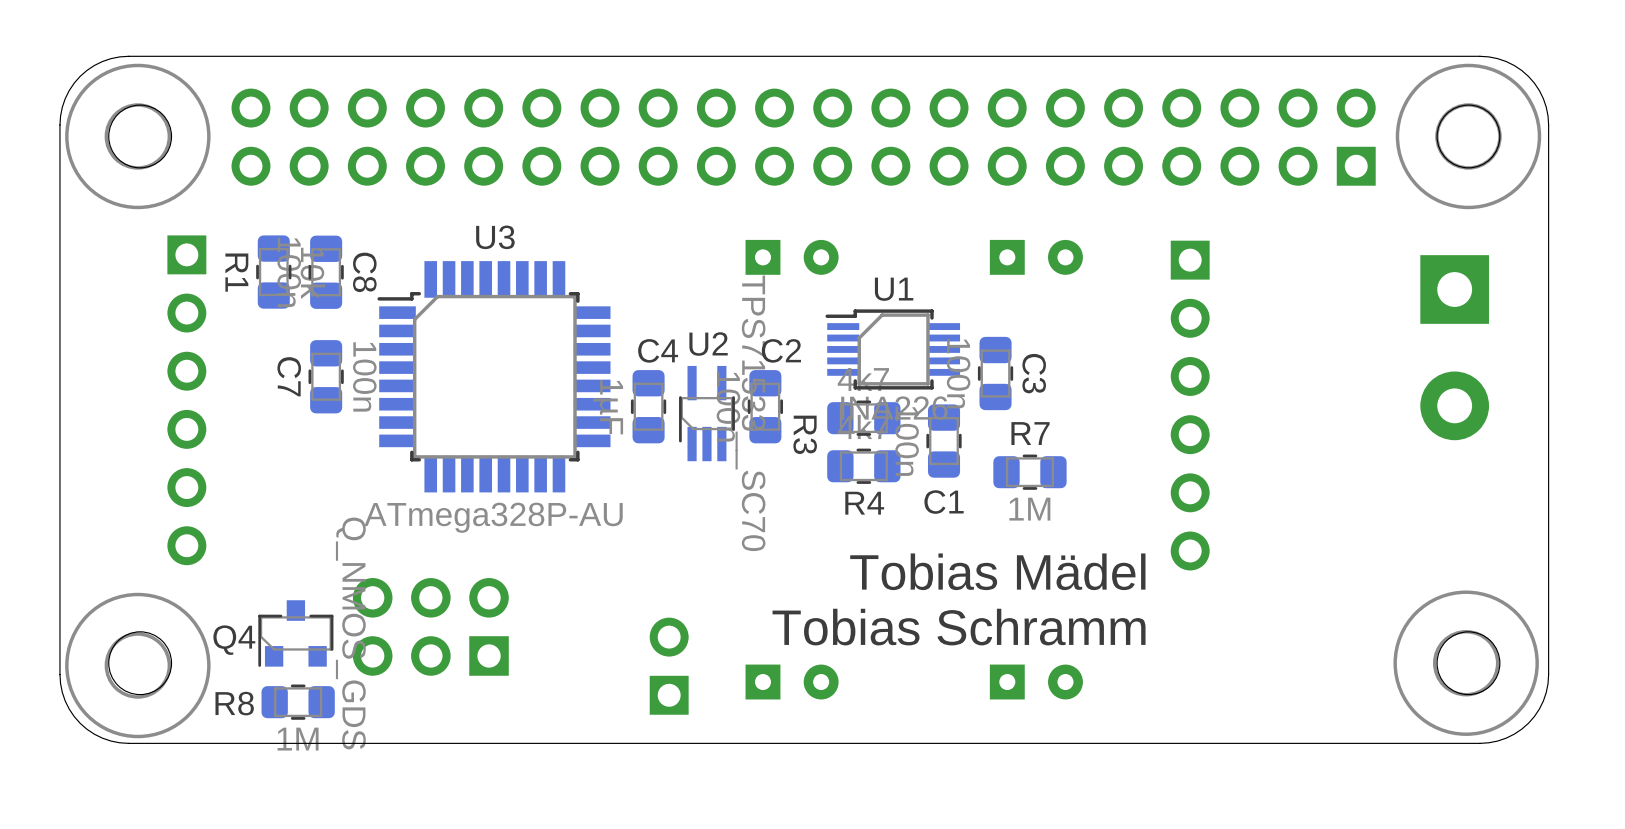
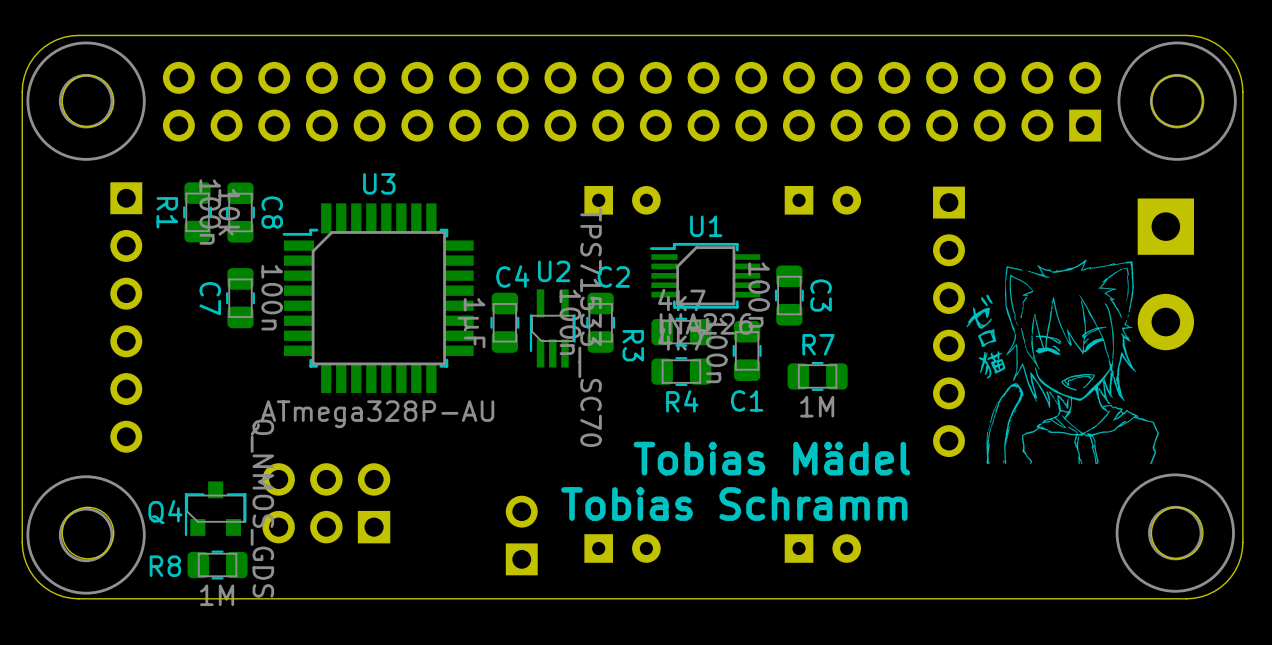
drawing: none -> [966, 259, 1160, 465]

